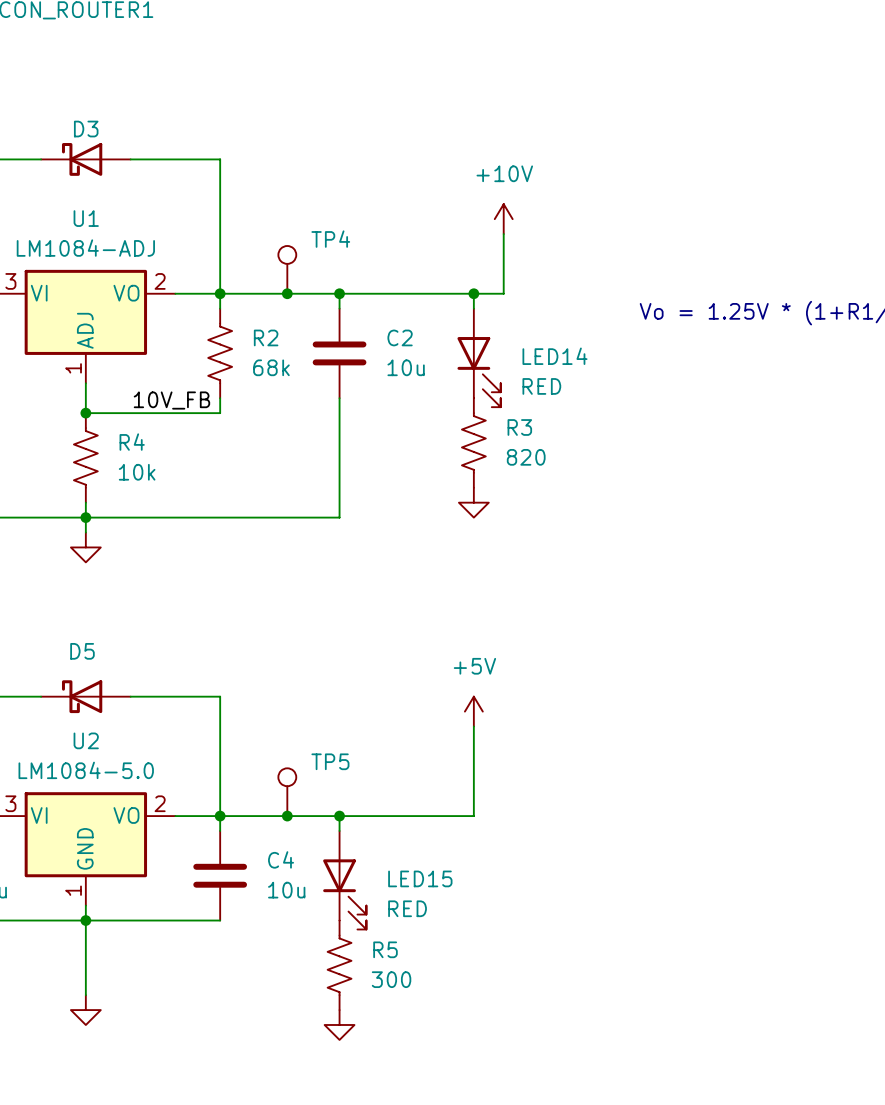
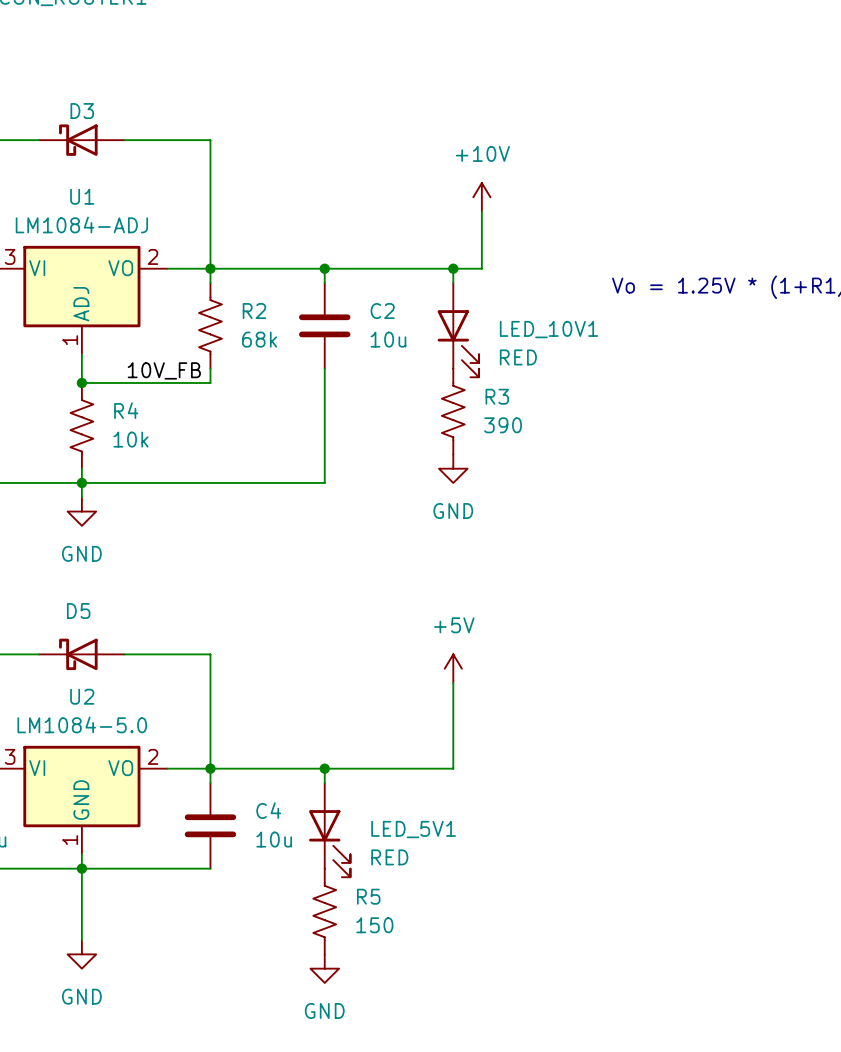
TP4: (287, 269) -> none
junction: (287, 293) -> none
LED14 name: LED14 (554, 356) -> LED_10V1 (548, 329)
R3 value: 820 (526, 457) -> 390 (503, 425)
power symbol text: none -> GND (453, 511)
power symbol text: none -> GND (81, 553)
TP5: (287, 792) -> none
junction: (287, 816) -> none
LED15 name: LED15 (420, 878) -> LED_5V1 (413, 829)
R5 value: 300 (391, 979) -> 150 (374, 925)
power symbol text: none -> GND (81, 996)
power symbol text: none -> GND (324, 1010)

